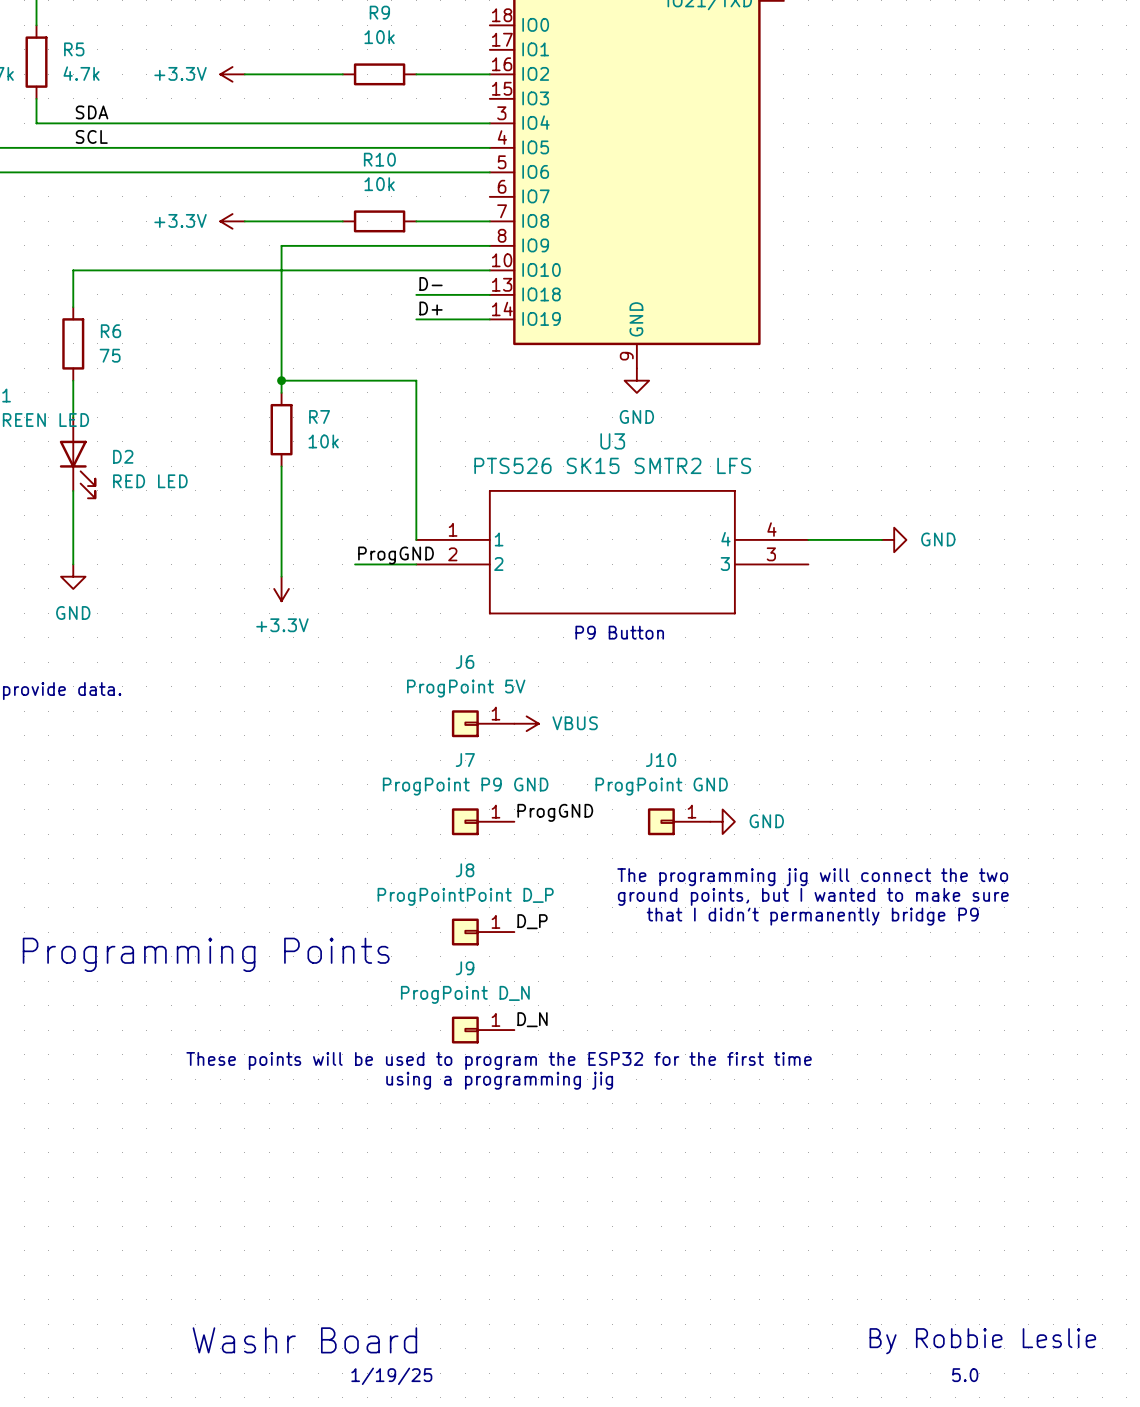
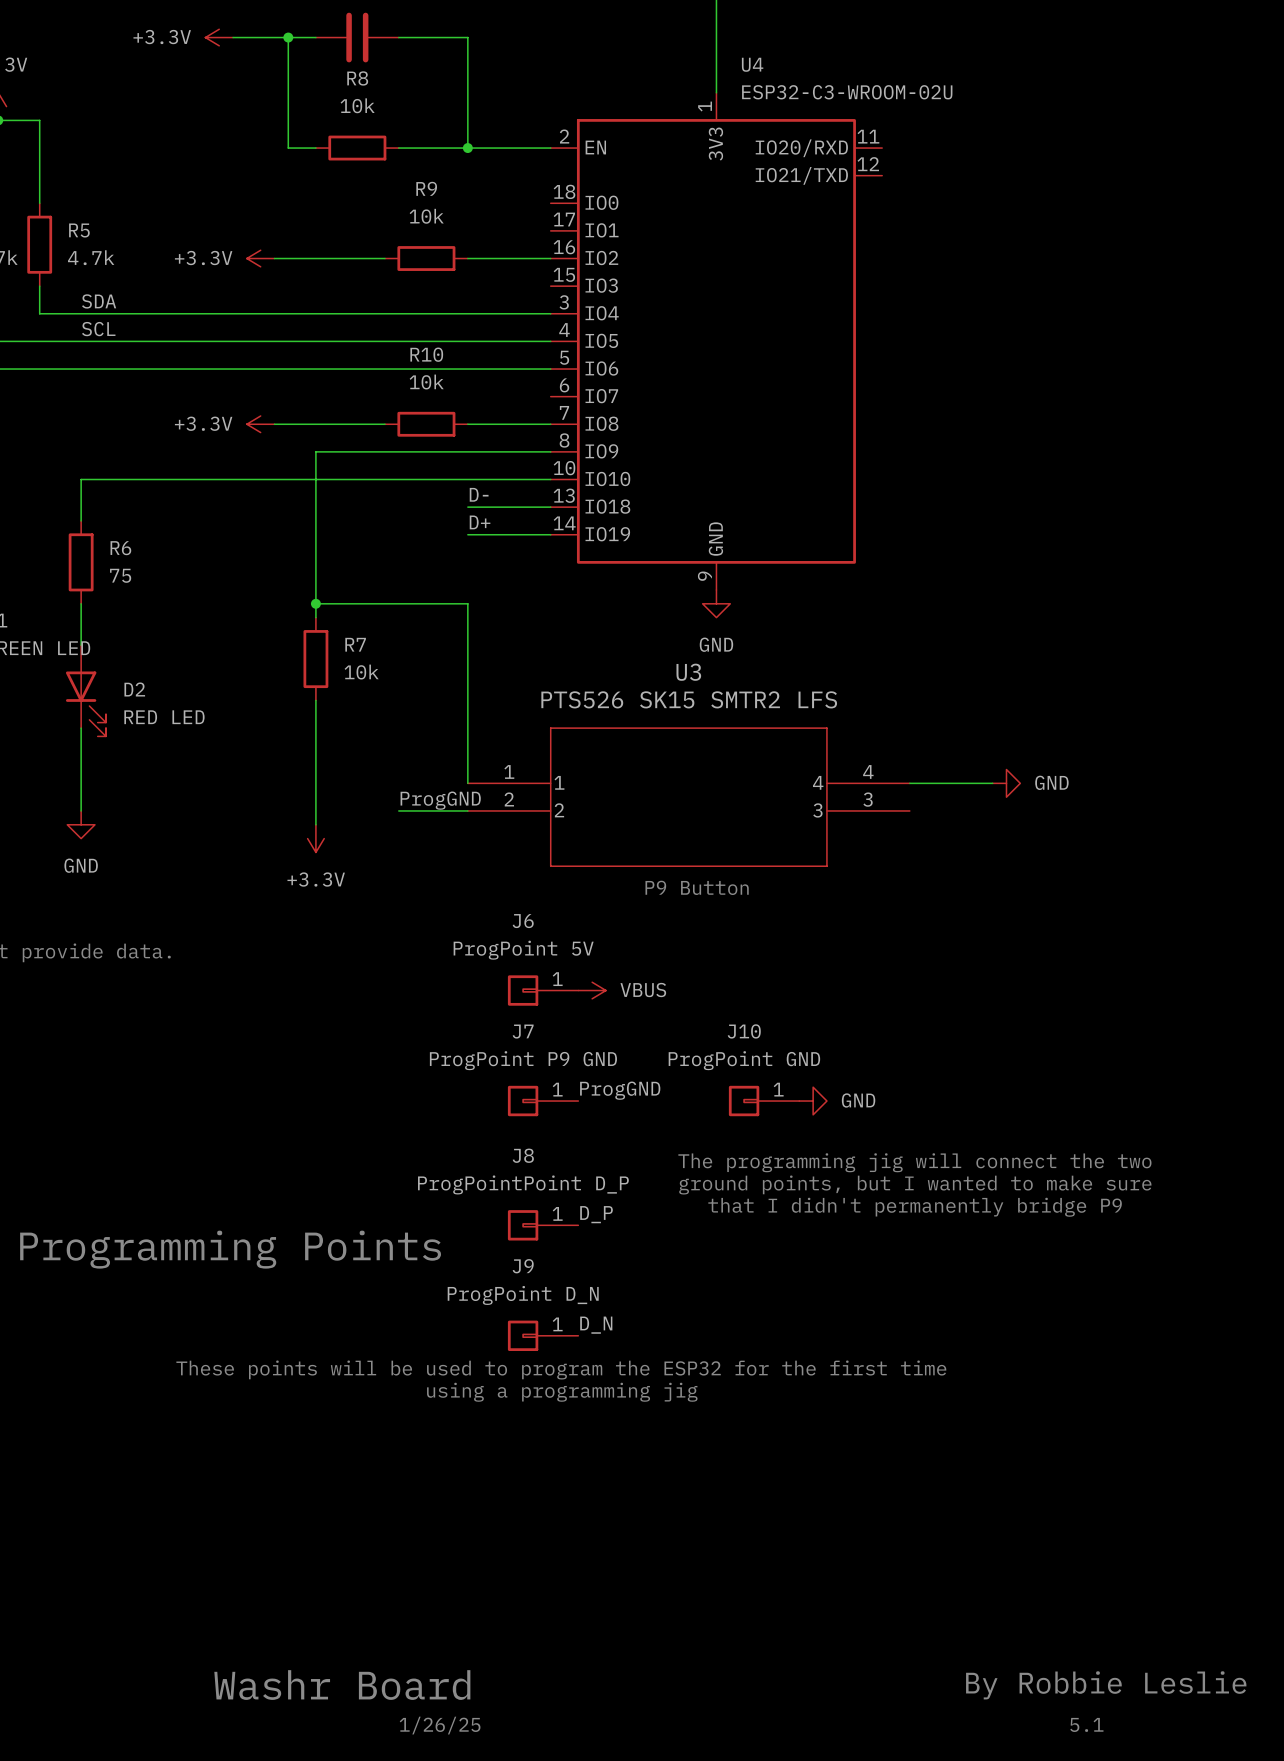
text: 5.0 (965, 1375) -> 5.1 (1086, 1724)
text: 1/19/25 (391, 1376) -> 1/26/25 (440, 1725)

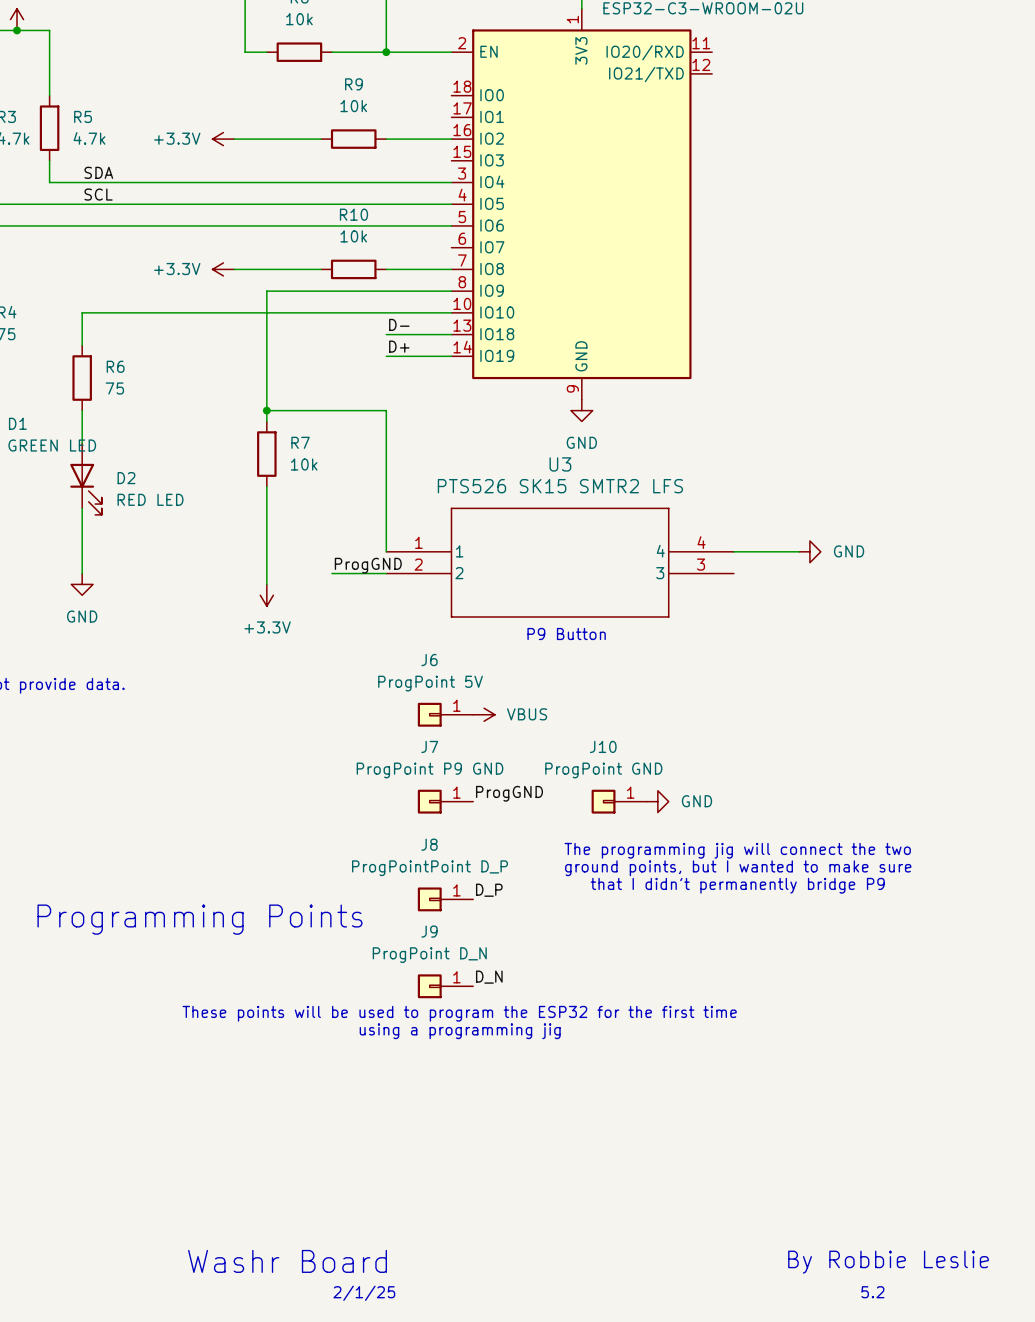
text: 5.1 (1086, 1724) -> 5.2 (872, 1292)
text: 1/26/25 (440, 1725) -> 2/1/25 (364, 1293)

